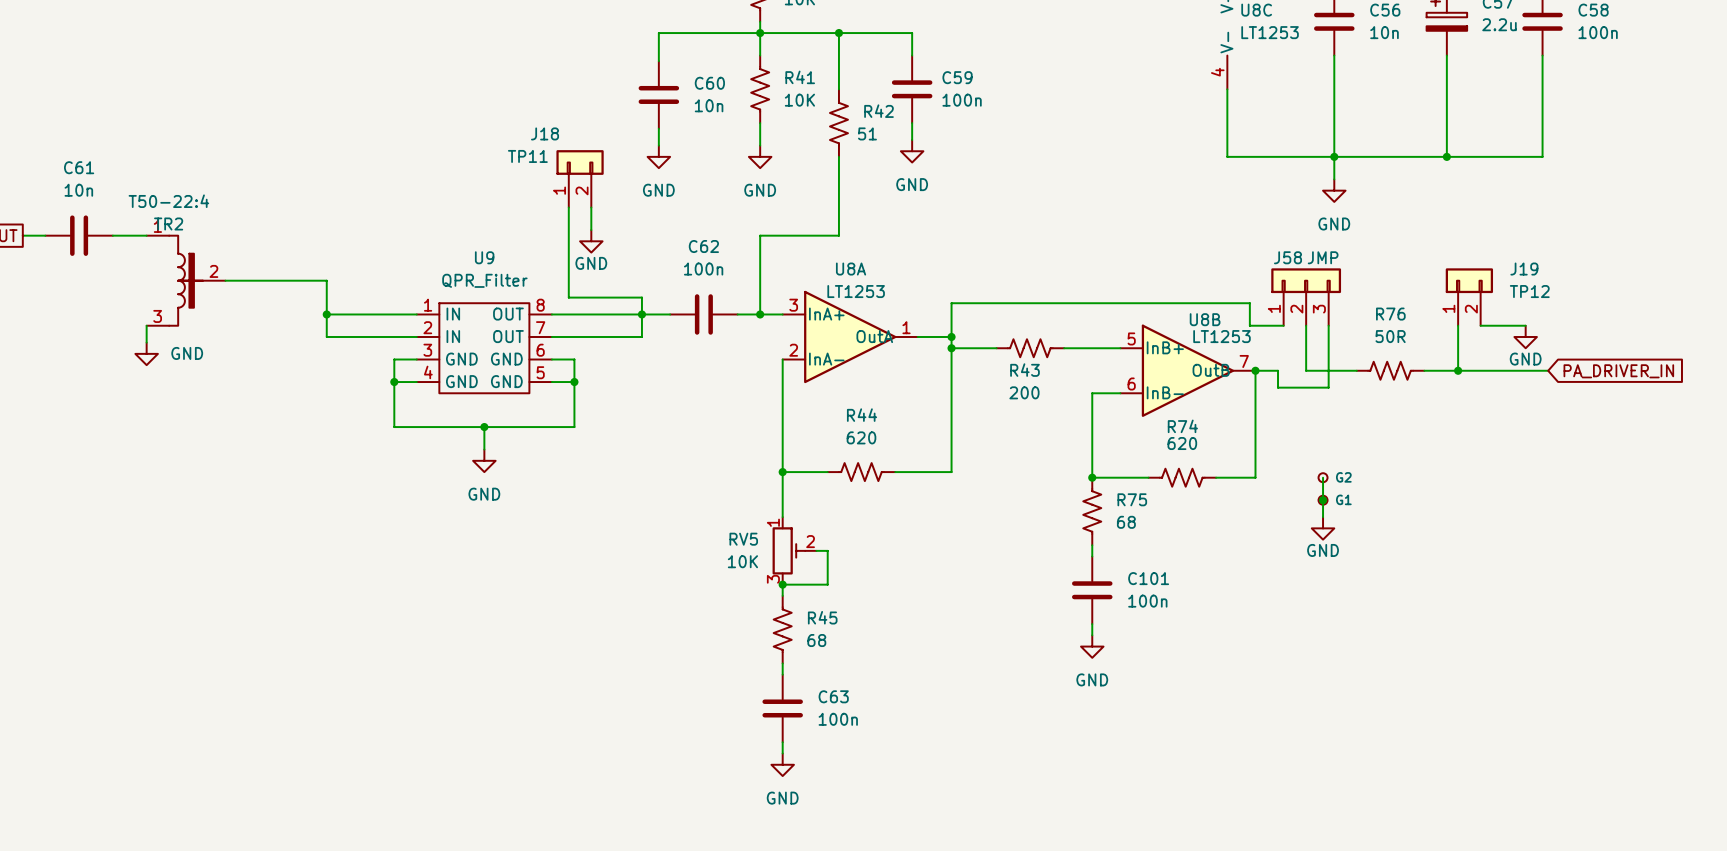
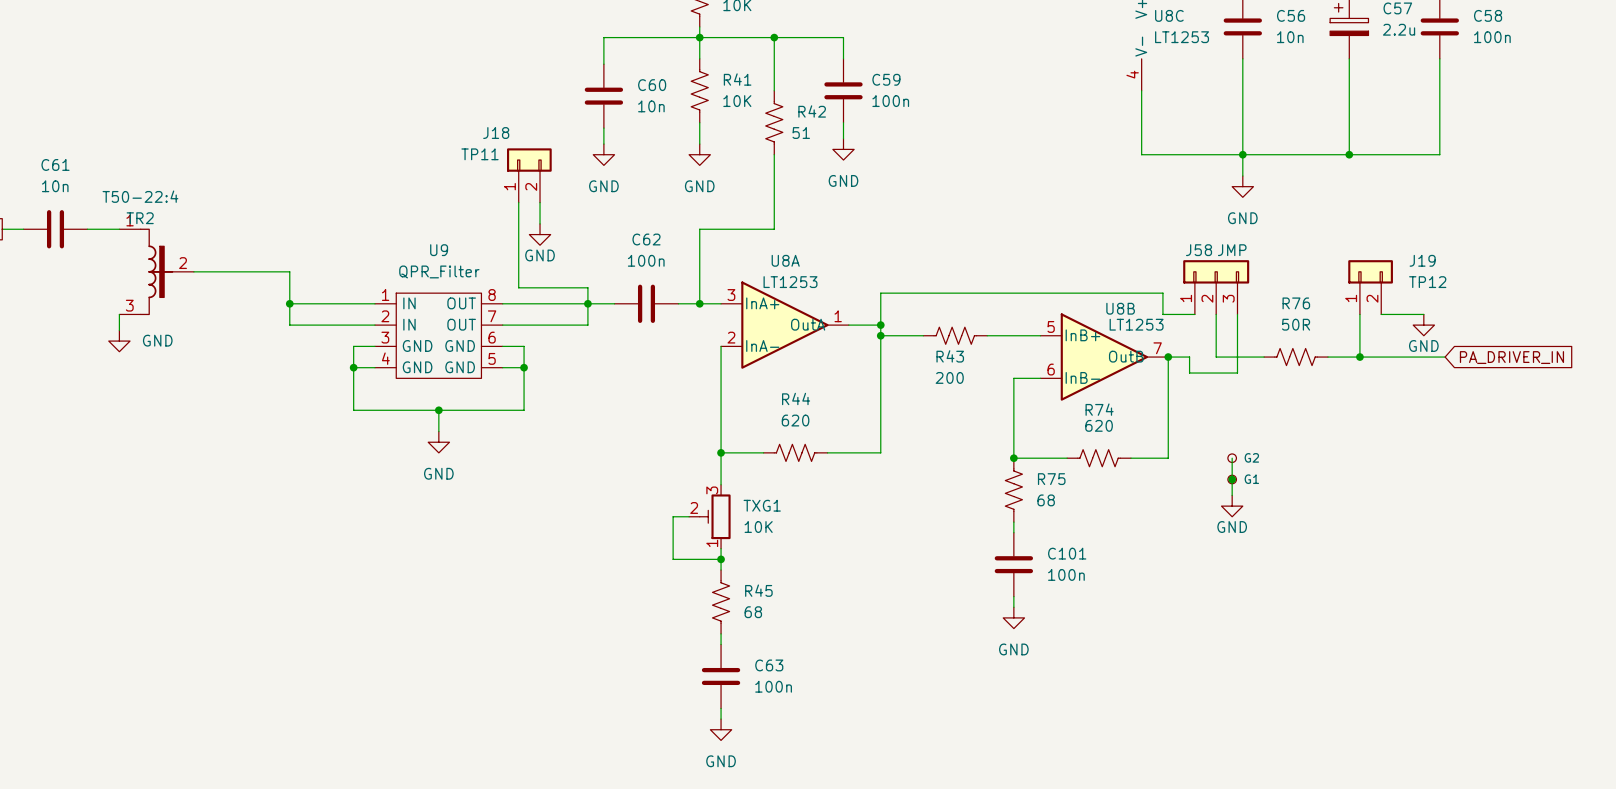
wire: none -> (689, 516) (673, 516) (673, 559) (721, 559) (721, 548)
TXG1: none -> 10K (709, 516)
RV5: 10K (794, 550) -> none
wire: (816, 550) (827, 550) (827, 584) (782, 584) -> none

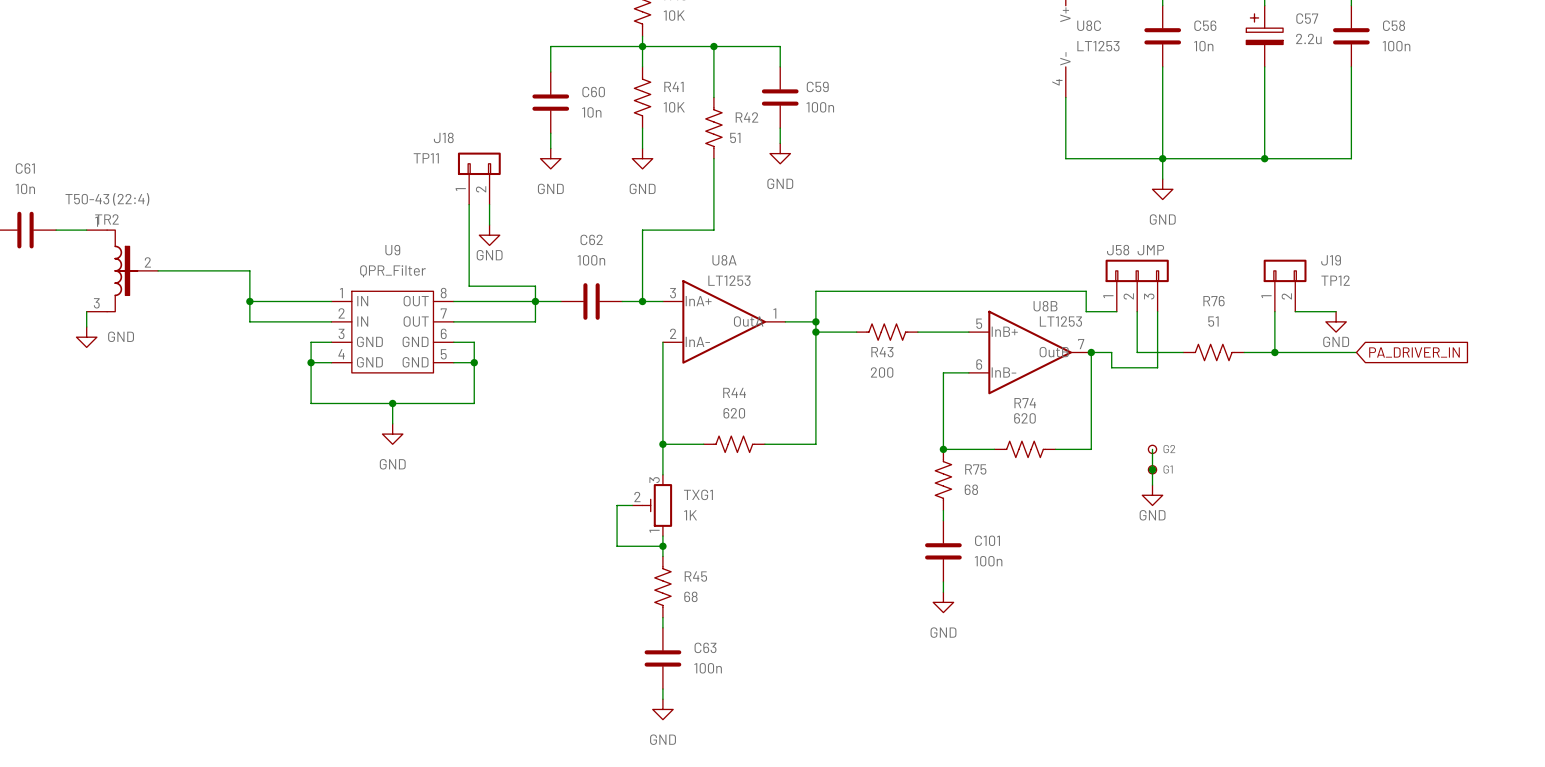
TR2 value: T50-22:4 (140, 196) -> T50-43 (22:4) (107, 199)
R76 value: 50R (1296, 324) -> 51 (1213, 321)
TXG1 value: 10K (758, 527) -> 1K (690, 515)

